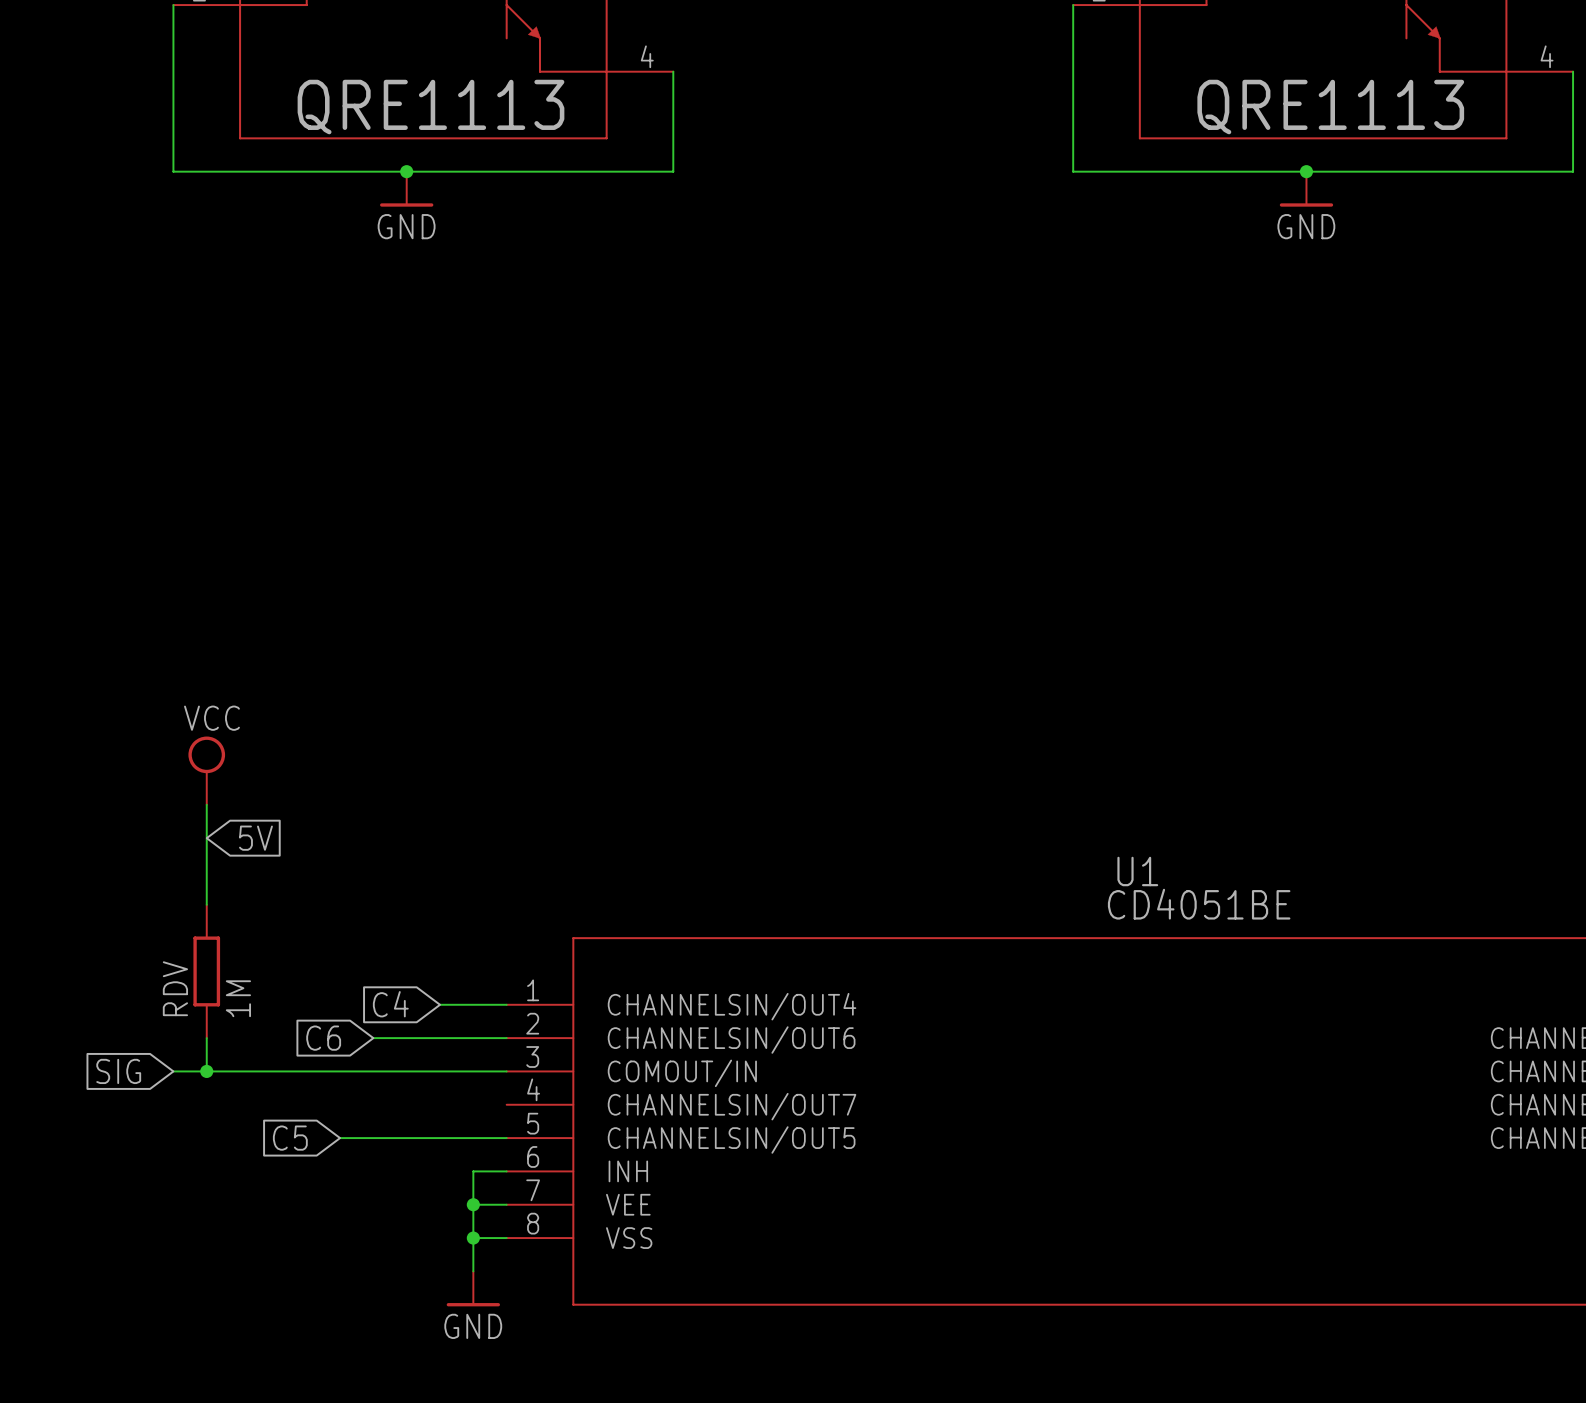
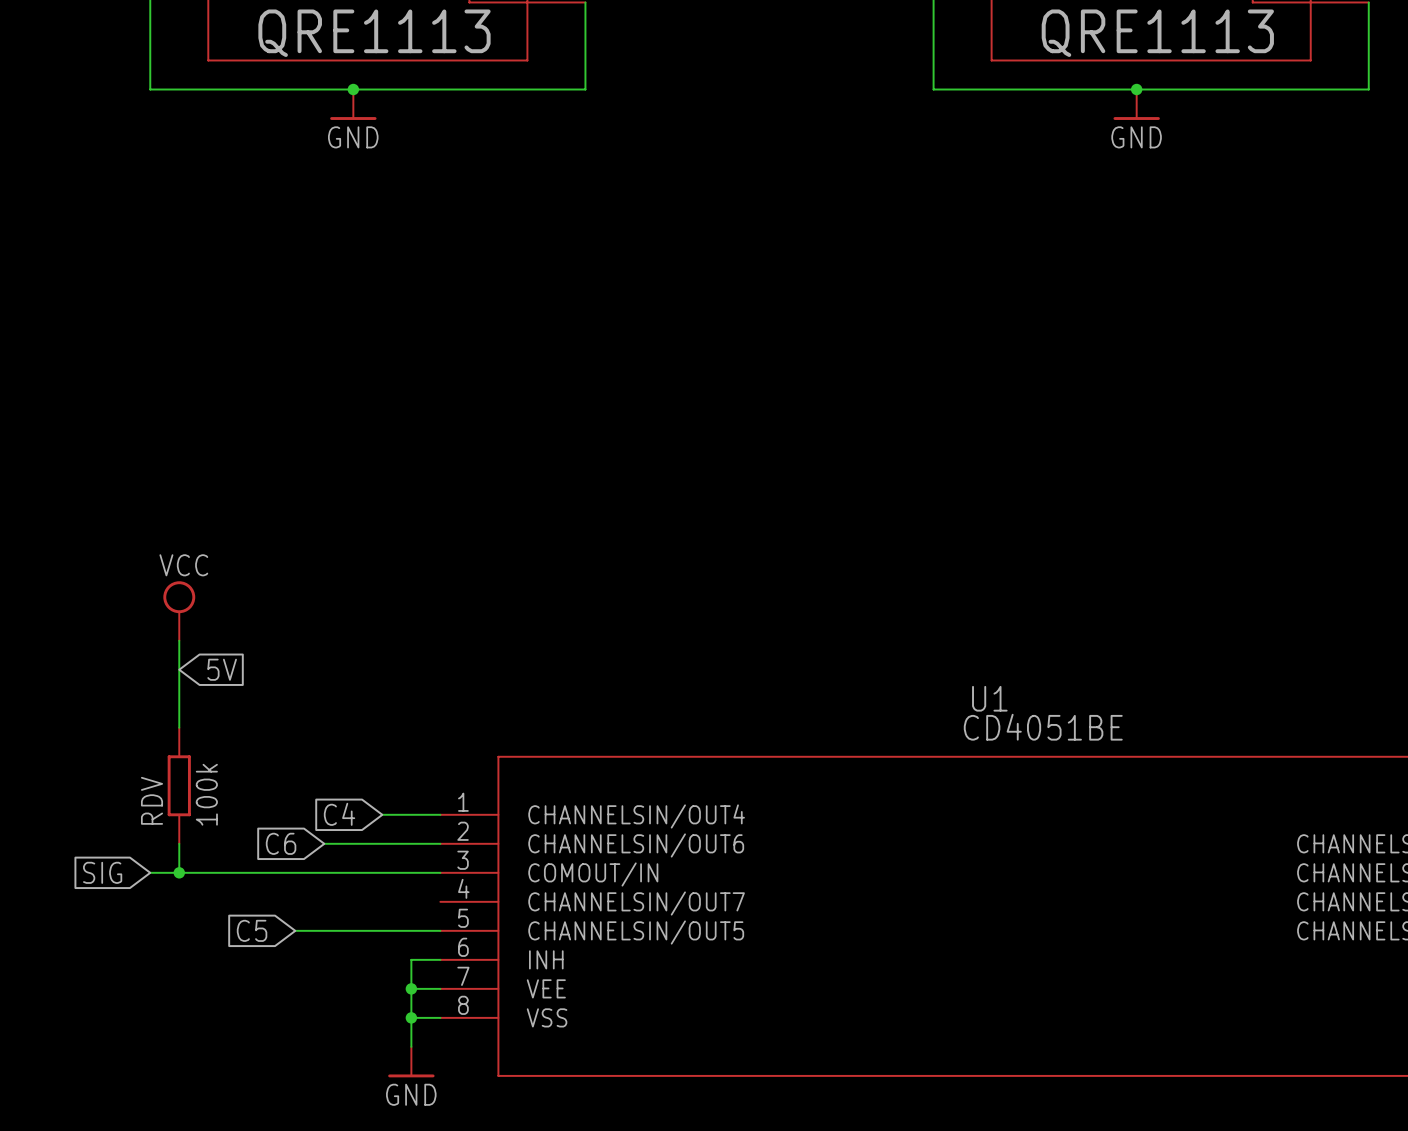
RDV value: 1M (238, 998) -> 100k (206, 794)

